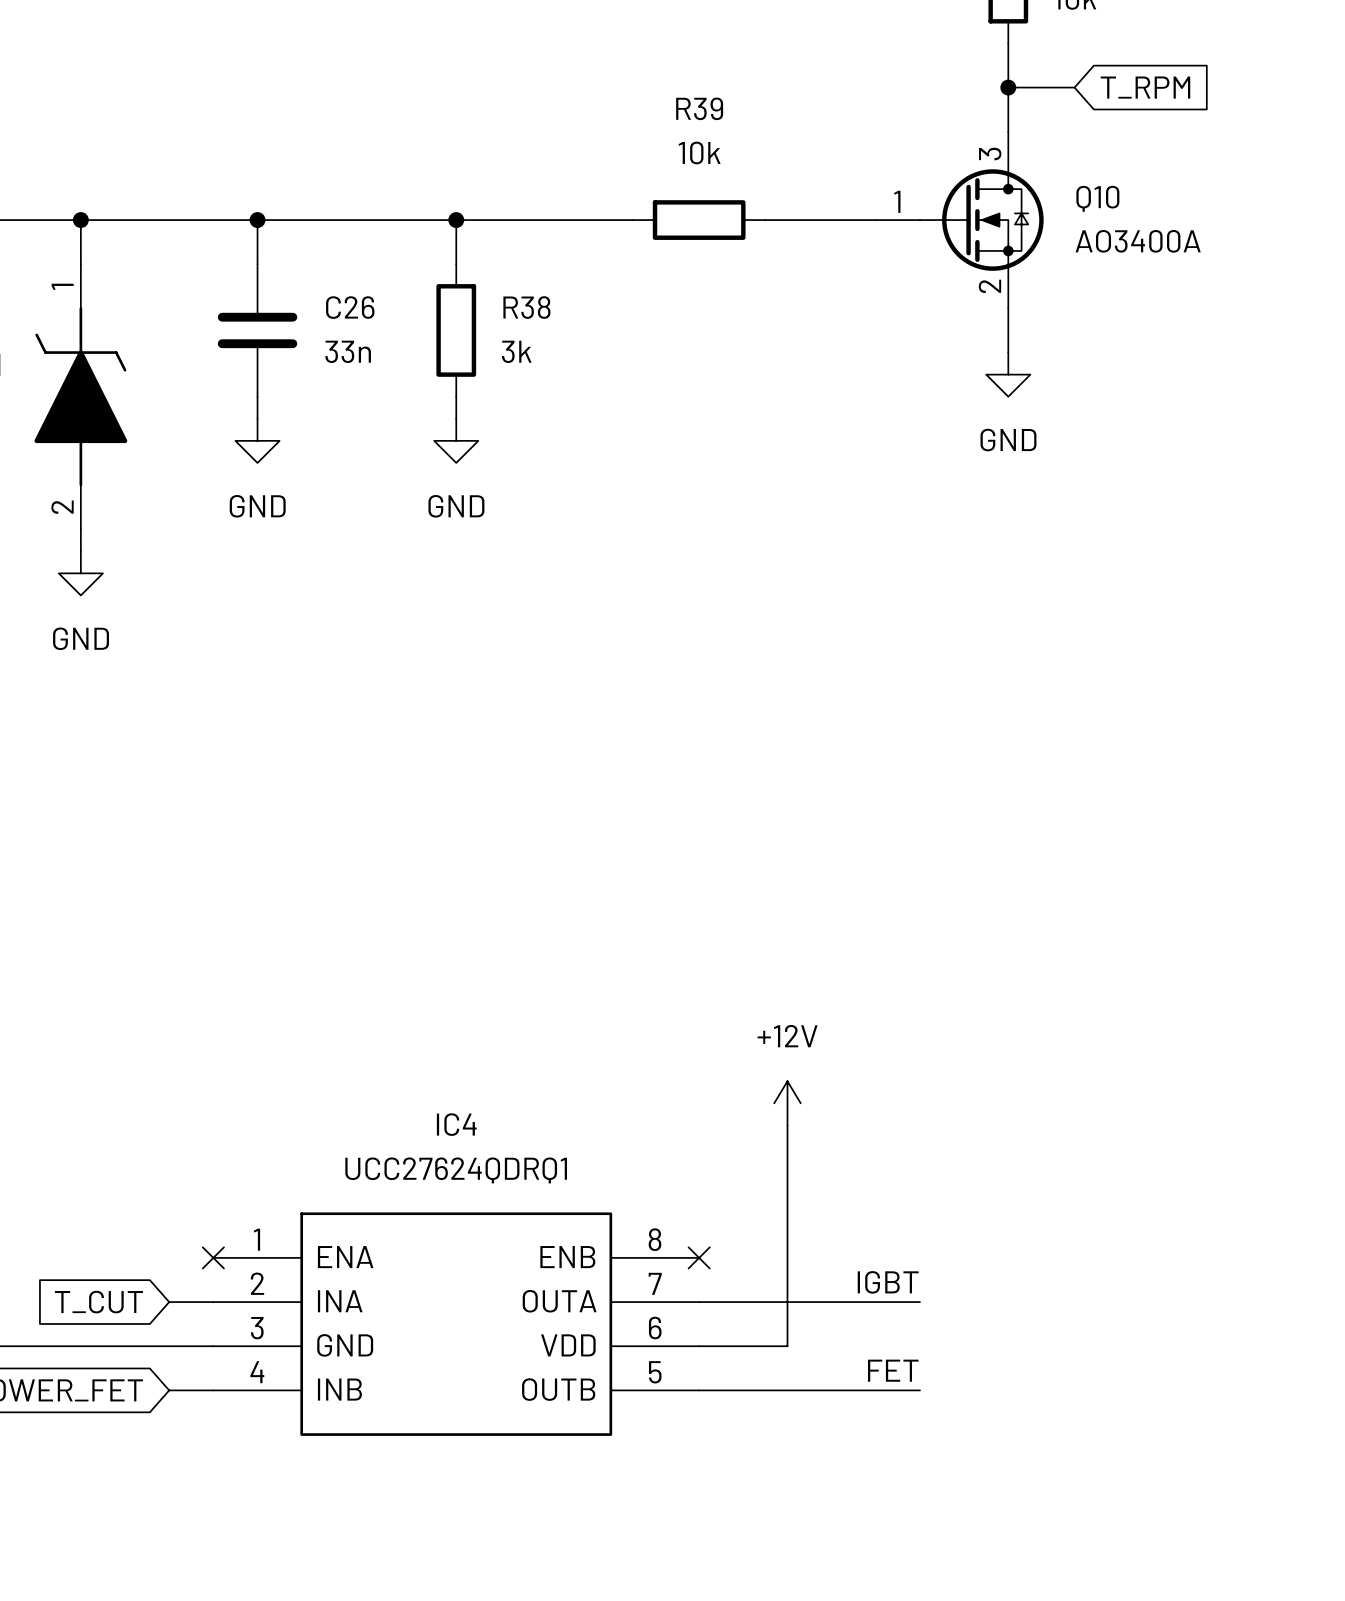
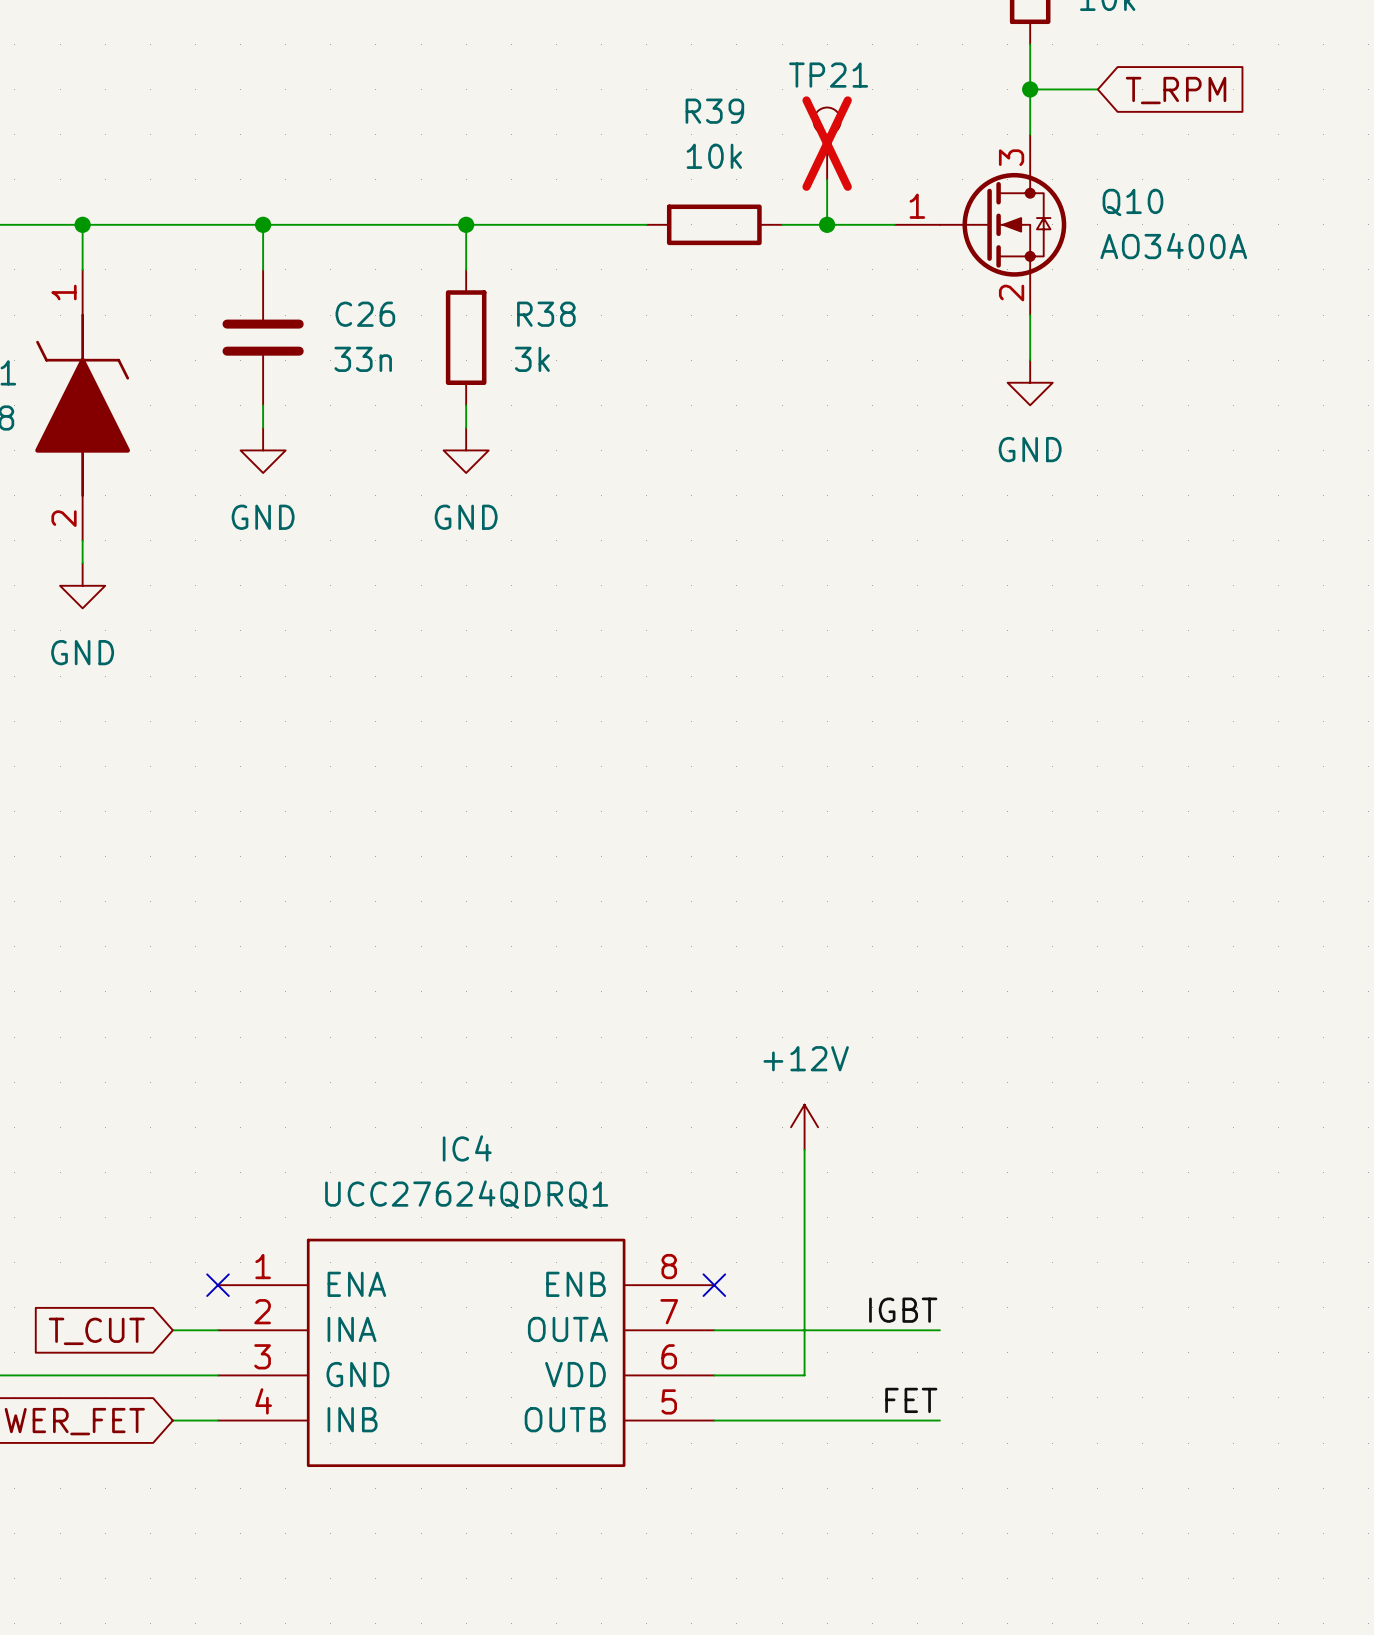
TP21: none -> (827, 143)
wire: none -> (827, 179) (827, 224)
junction: none -> (827, 224)

